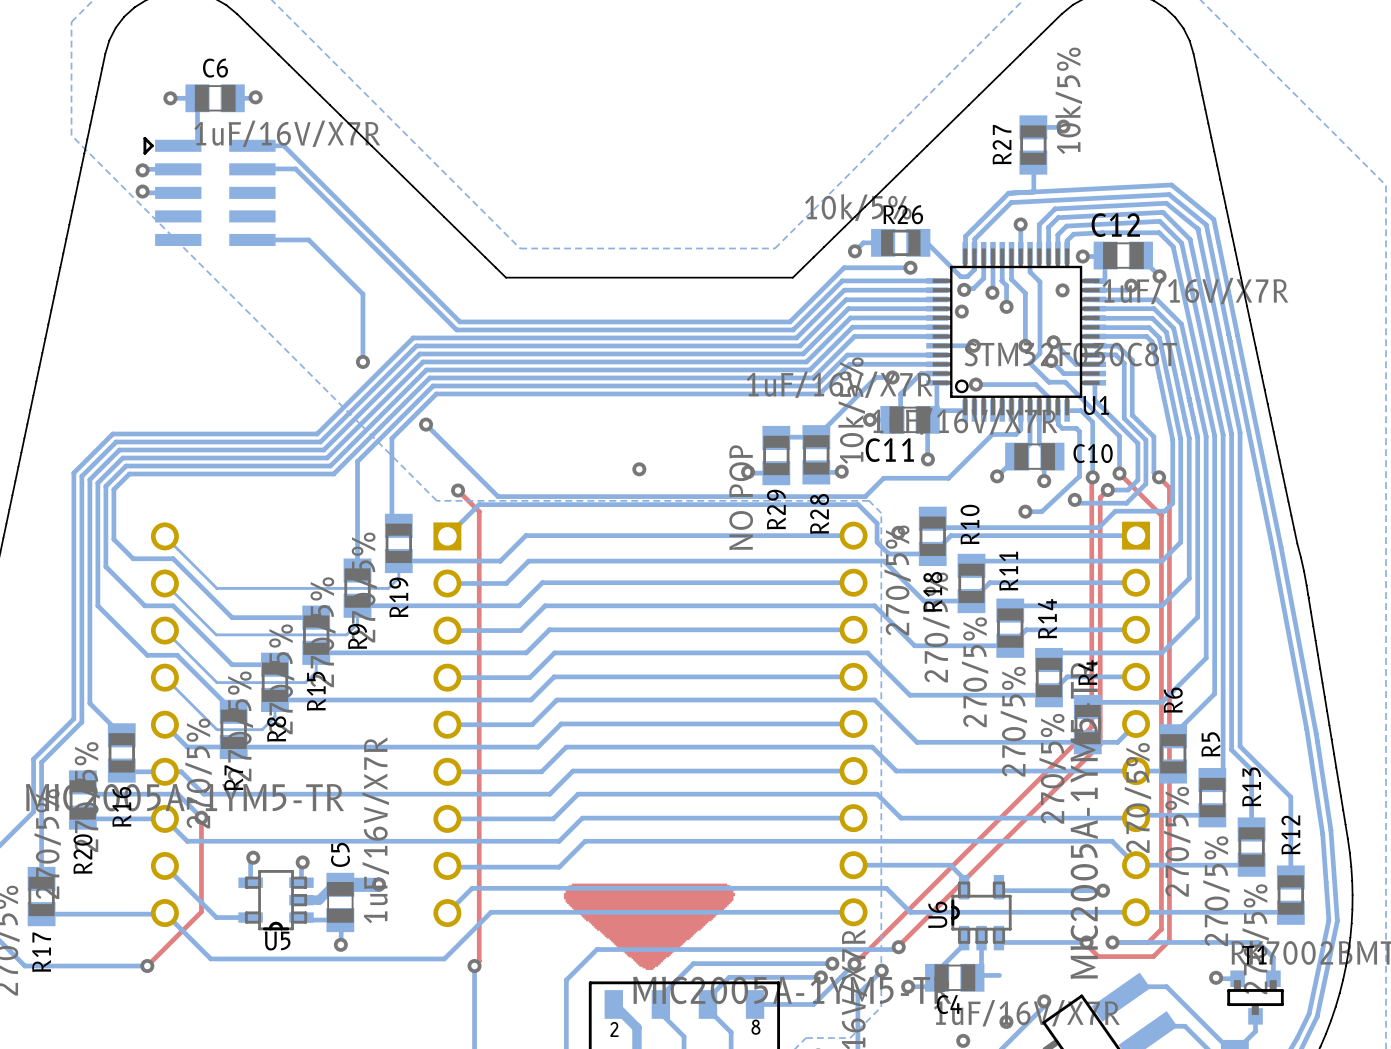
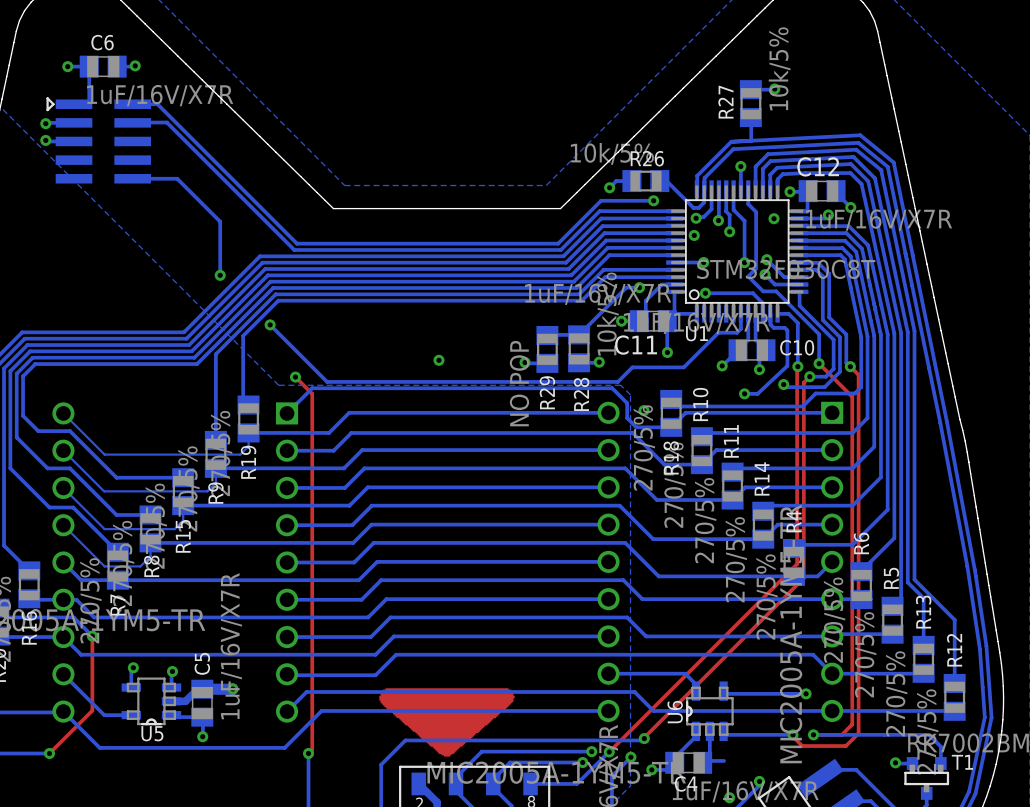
U1 name position: U1 (1096, 405) -> U1 (696, 333)
T1 name position: T1 (1254, 955) -> T1 (962, 762)

